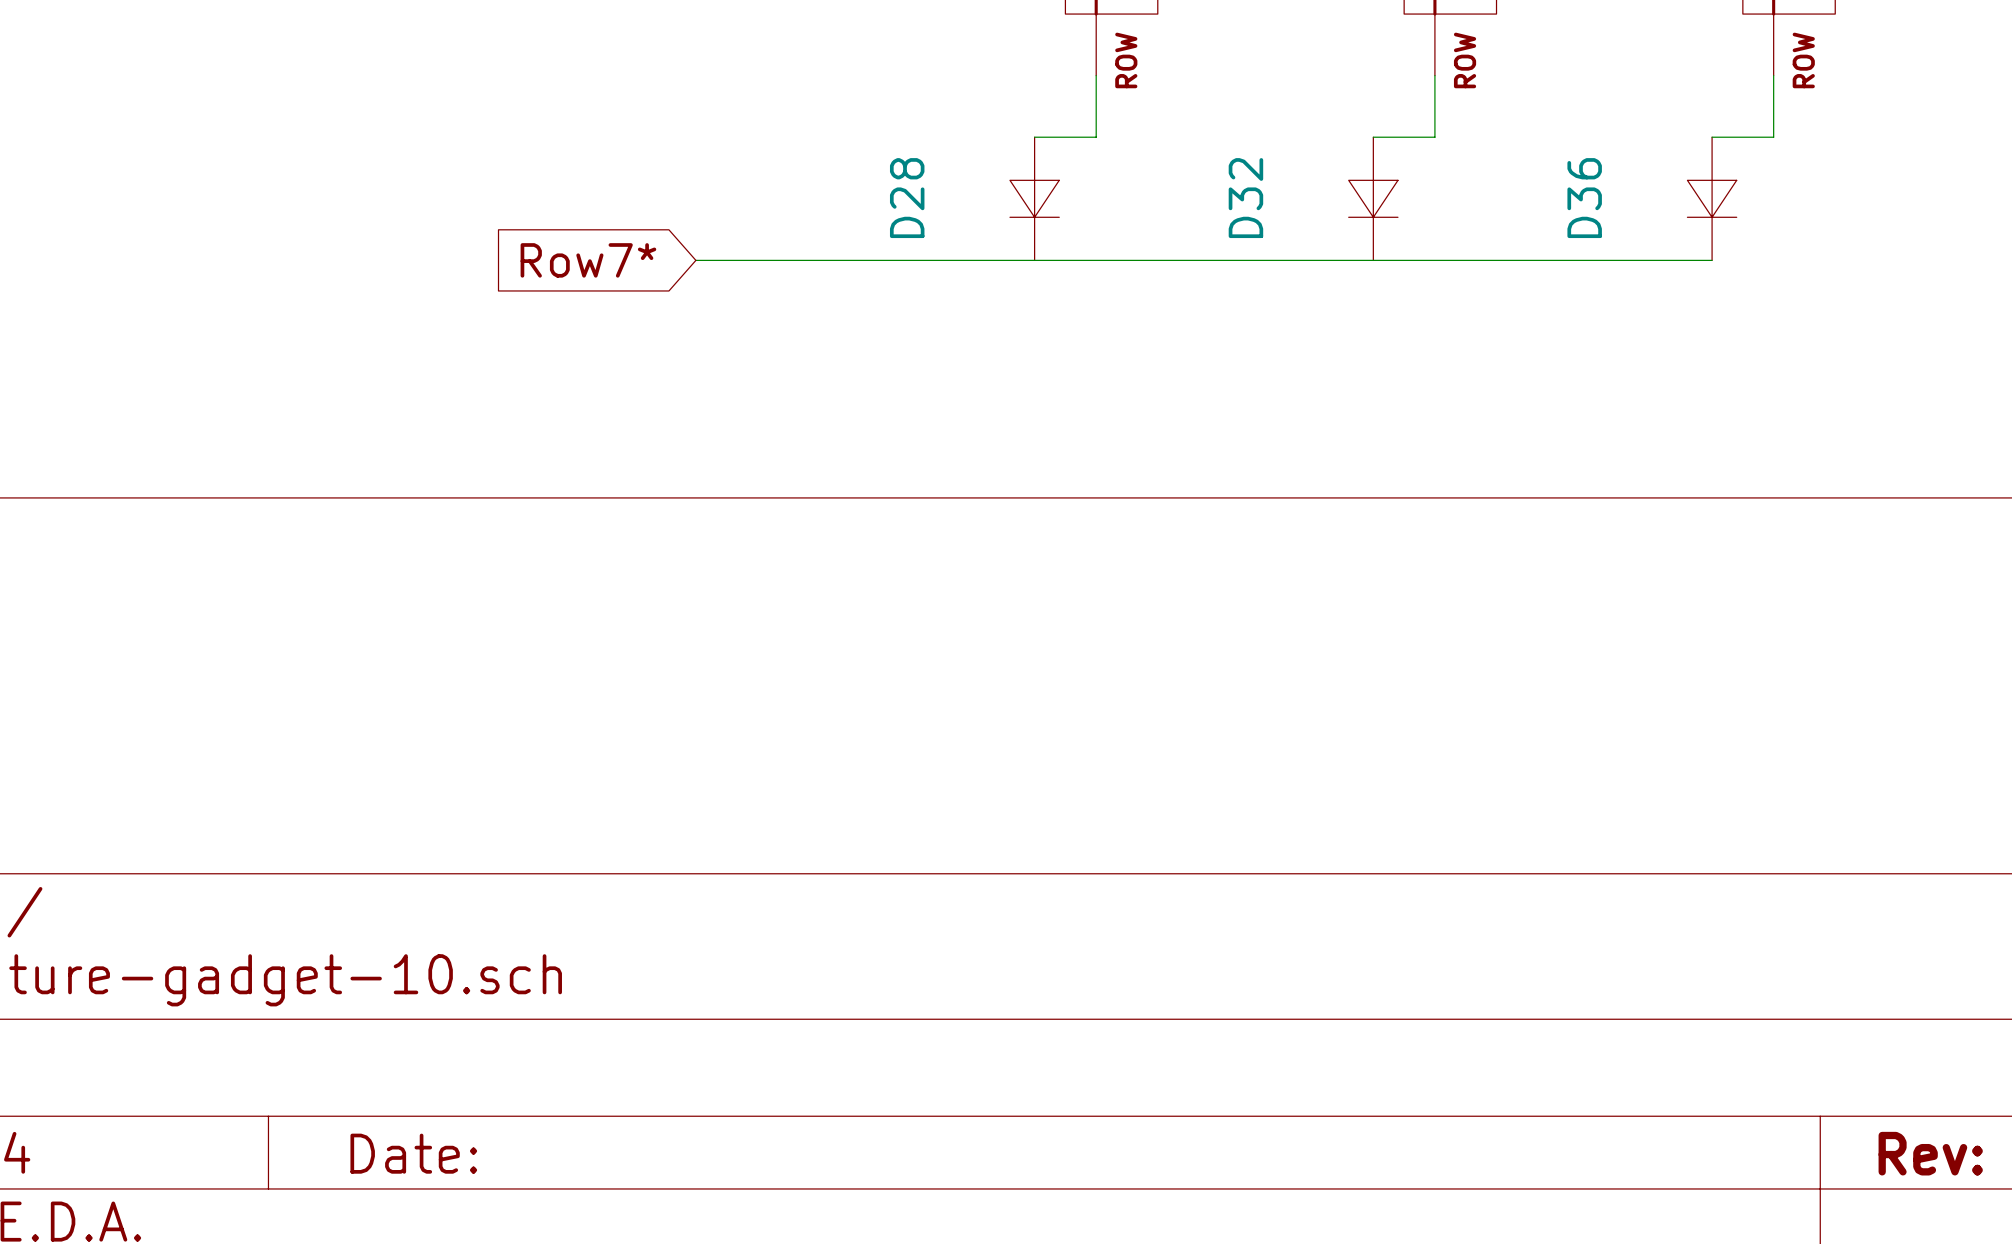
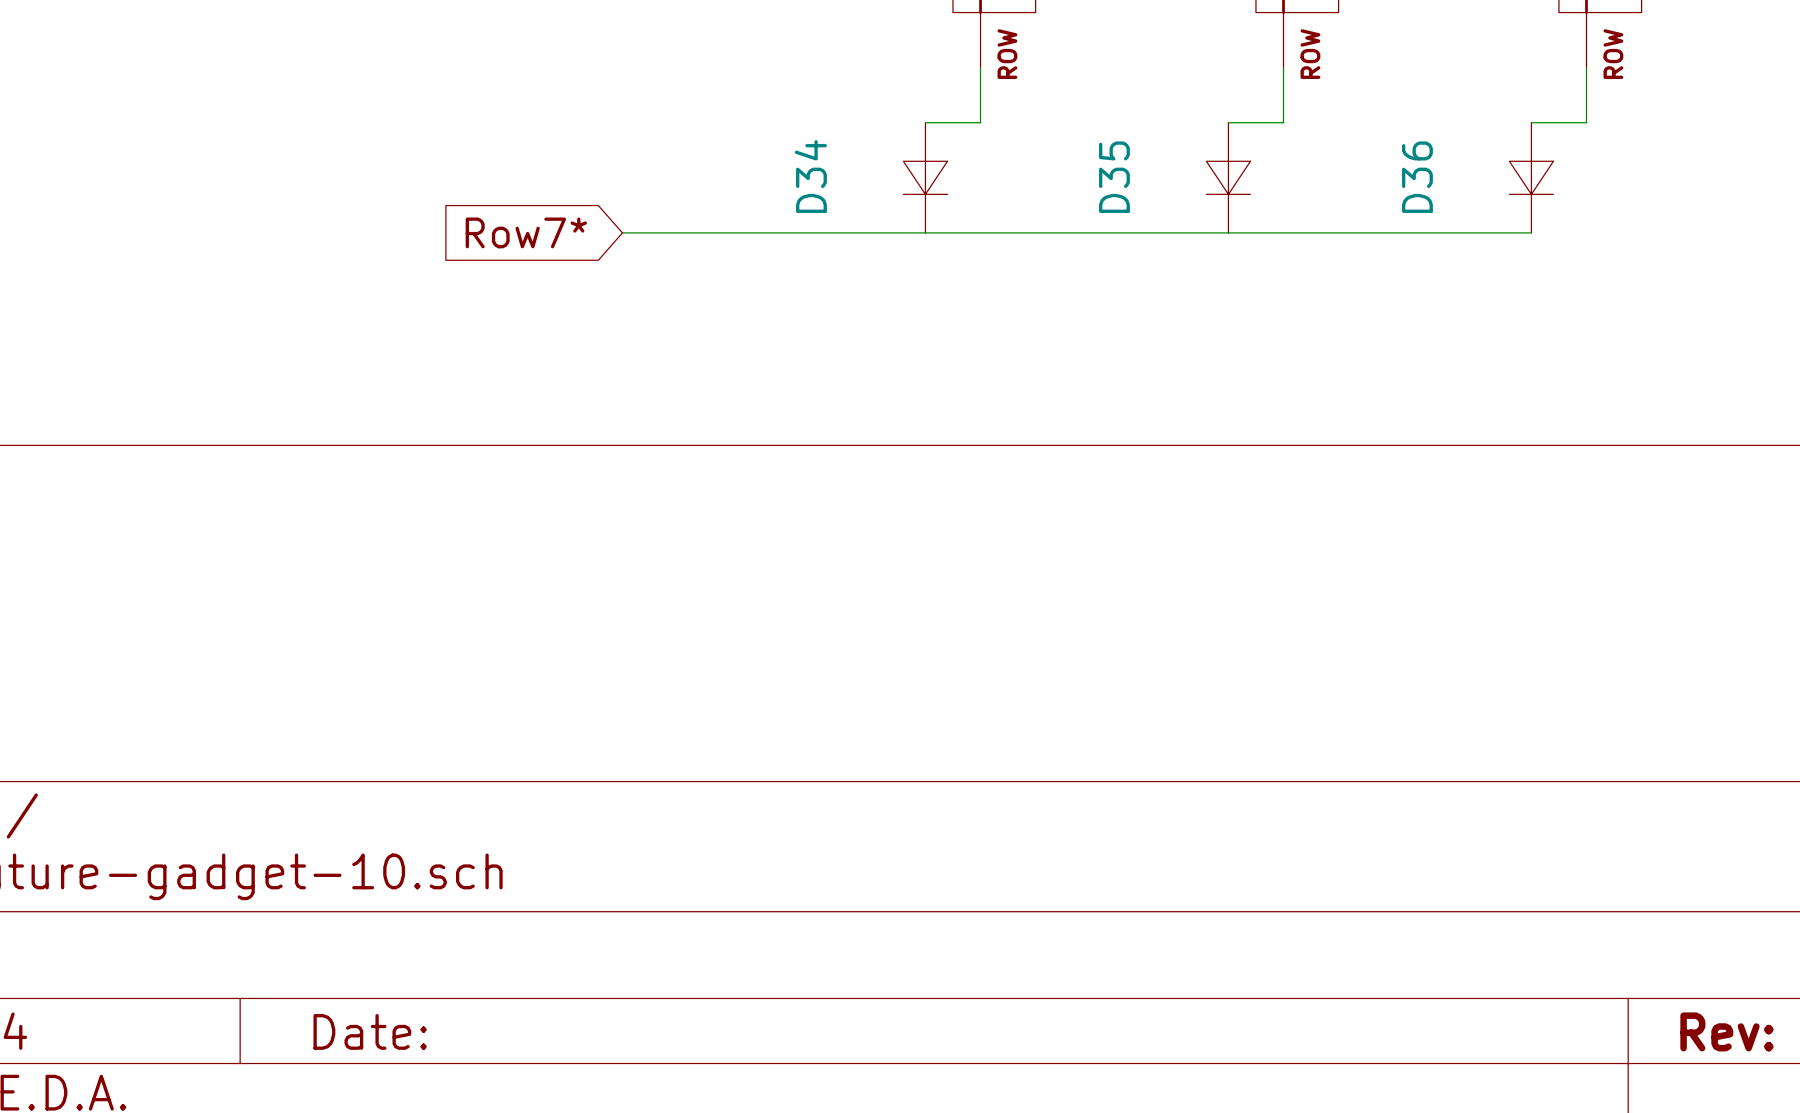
D28 name: D28 (907, 198) -> D34 (810, 176)
D32 name: D32 (1245, 198) -> D35 (1114, 177)

